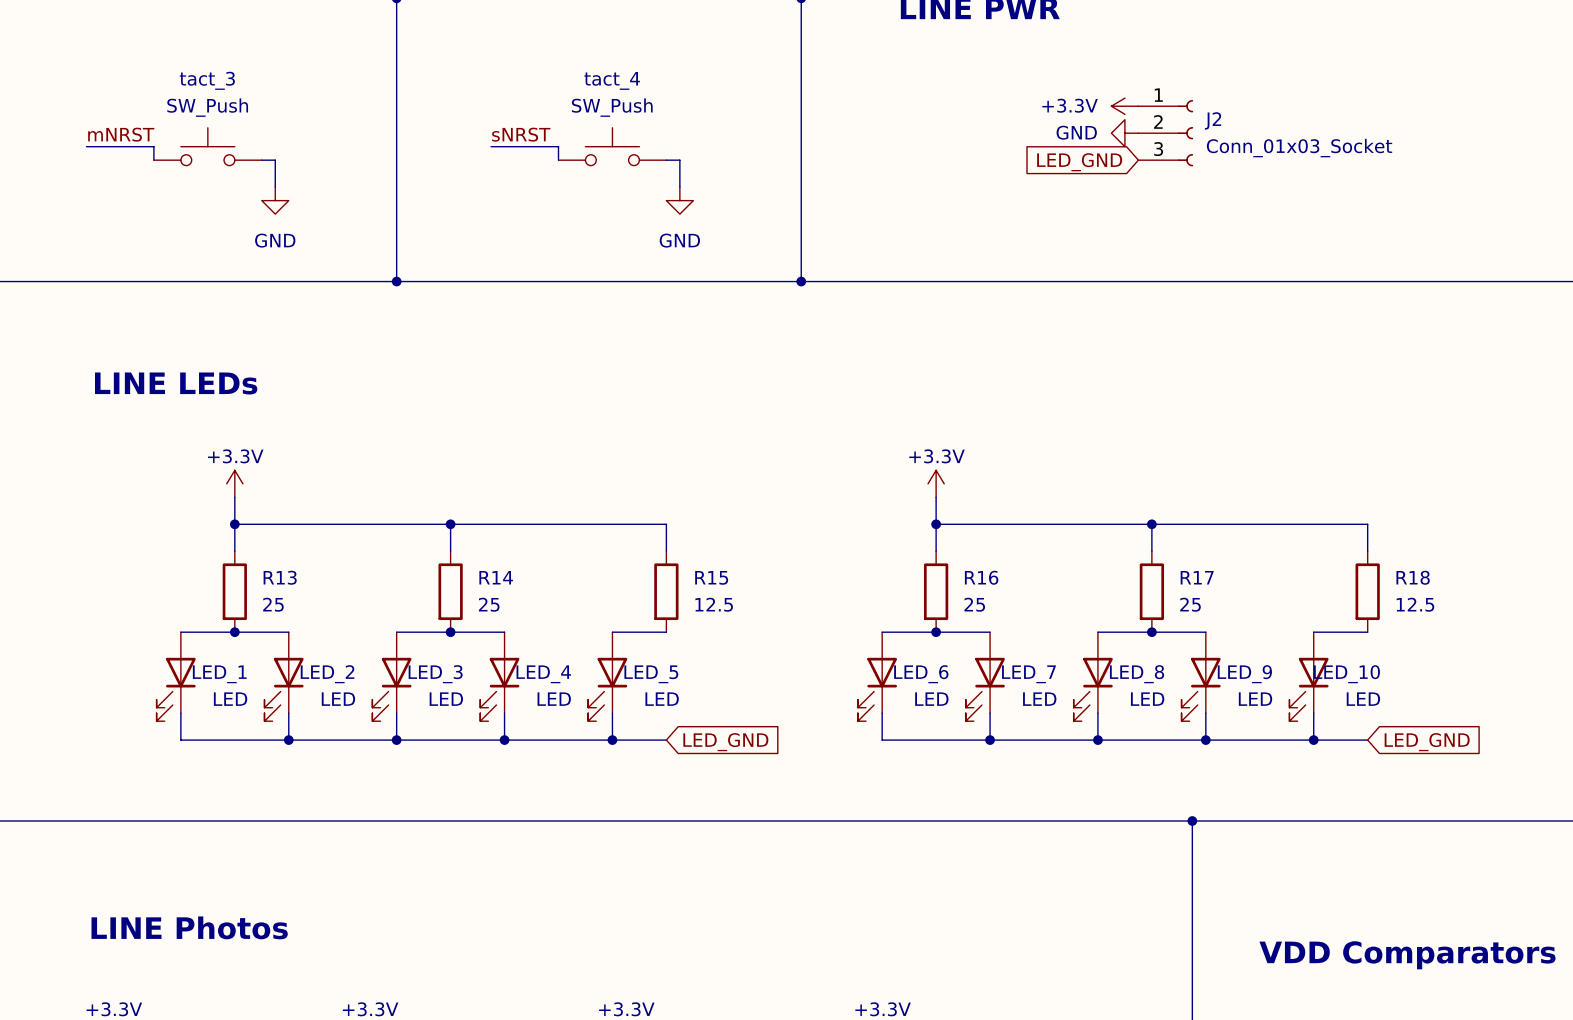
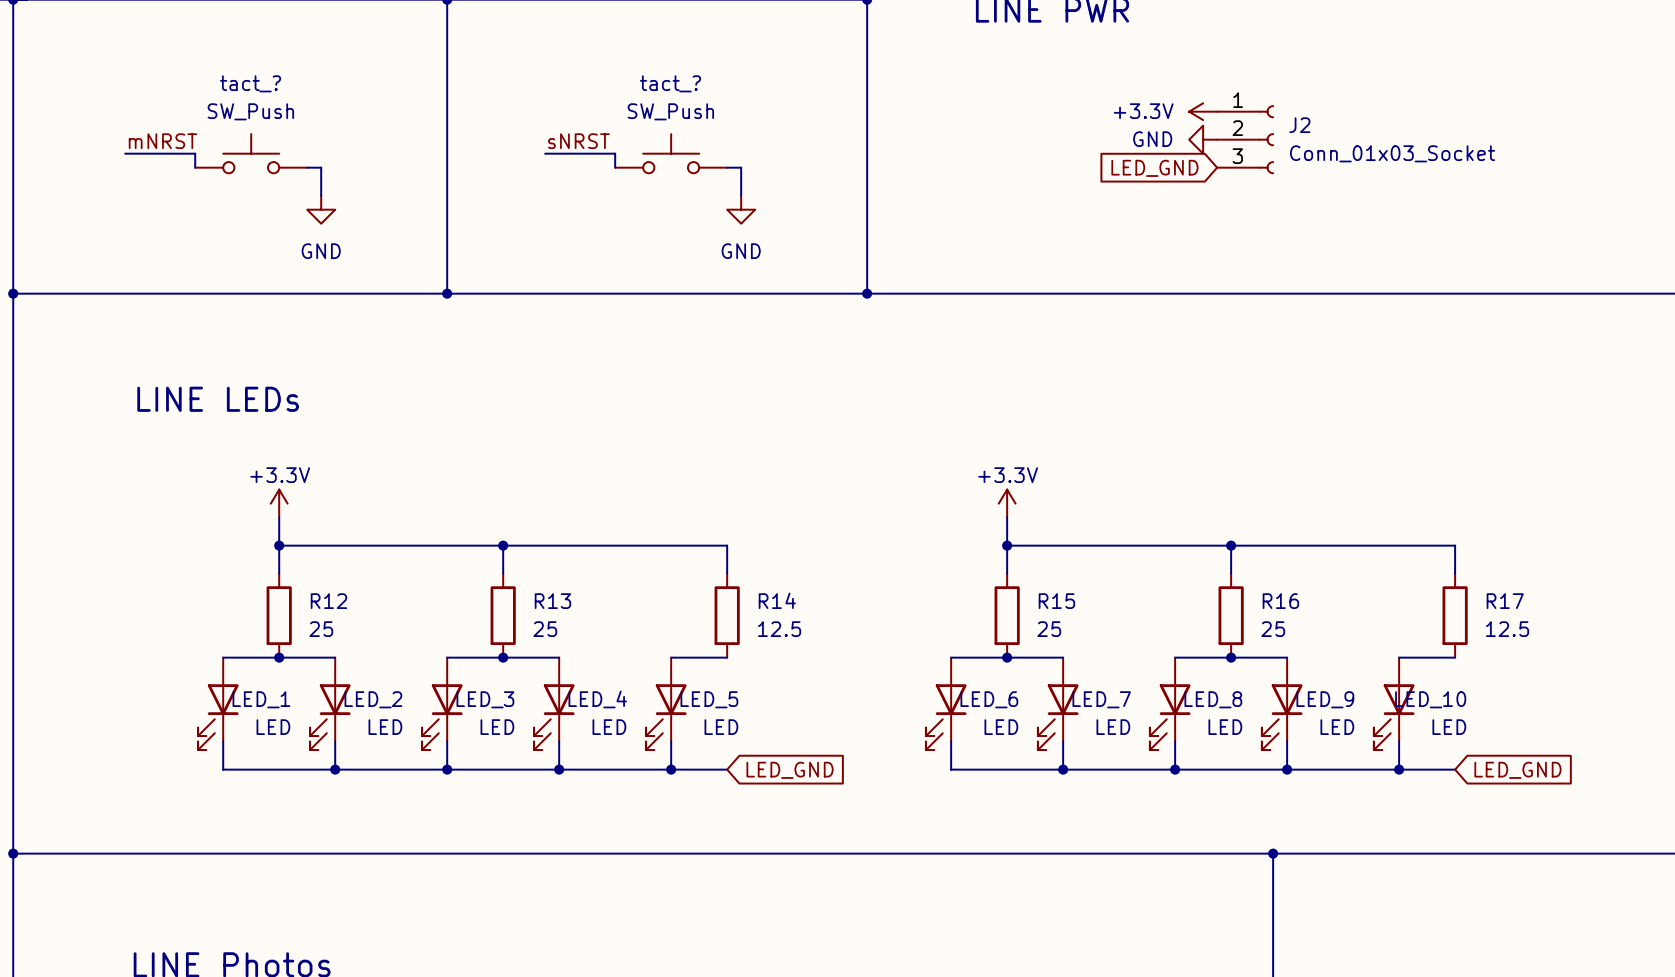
tact_3 name: tact_3 (207, 80) -> tact_? (250, 83)
tact_4 name: tact_4 (612, 80) -> tact_? (670, 83)
R13 name: R13 (280, 577) -> R12 (328, 601)
R14 name: R14 (496, 577) -> R13 (552, 601)
R15 name: R15 (711, 577) -> R14 (777, 600)
R16 name: R16 (981, 577) -> R15 (1056, 601)
R17 name: R17 (1197, 577) -> R16 (1280, 601)
R18 name: R18 (1413, 577) -> R17 (1505, 601)

